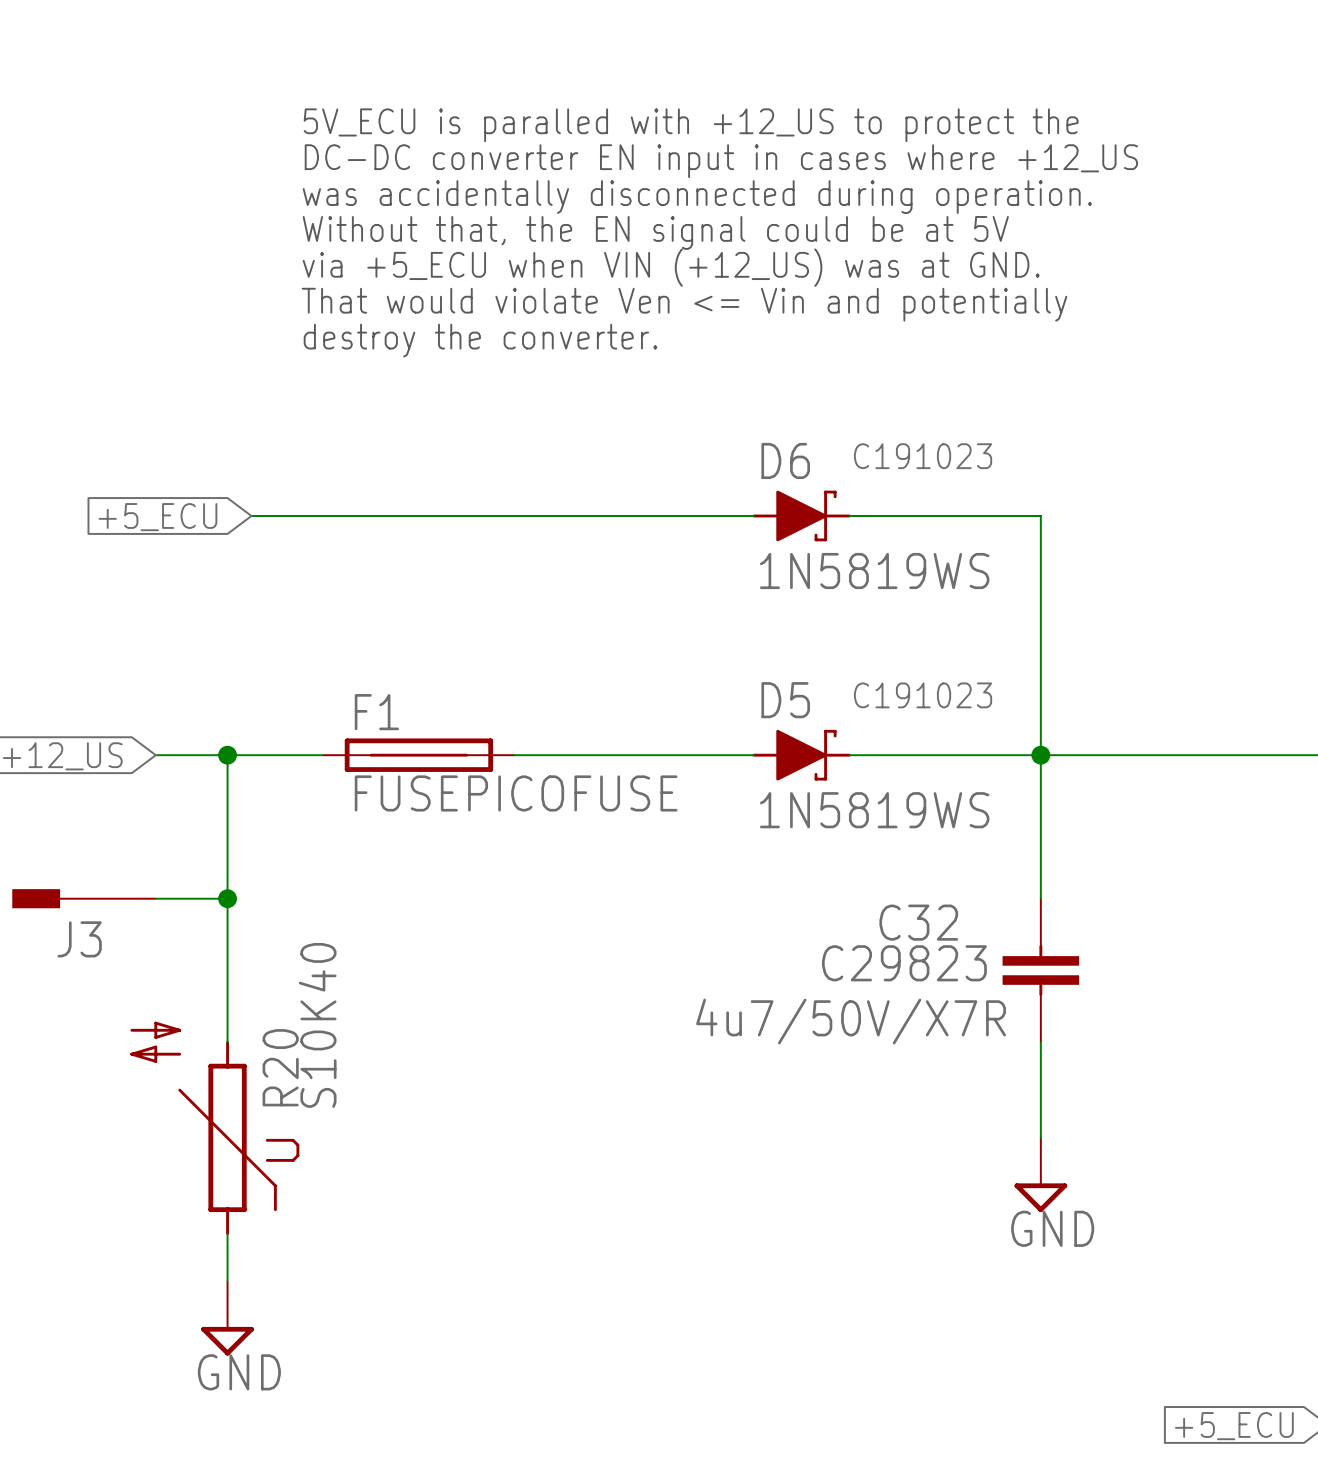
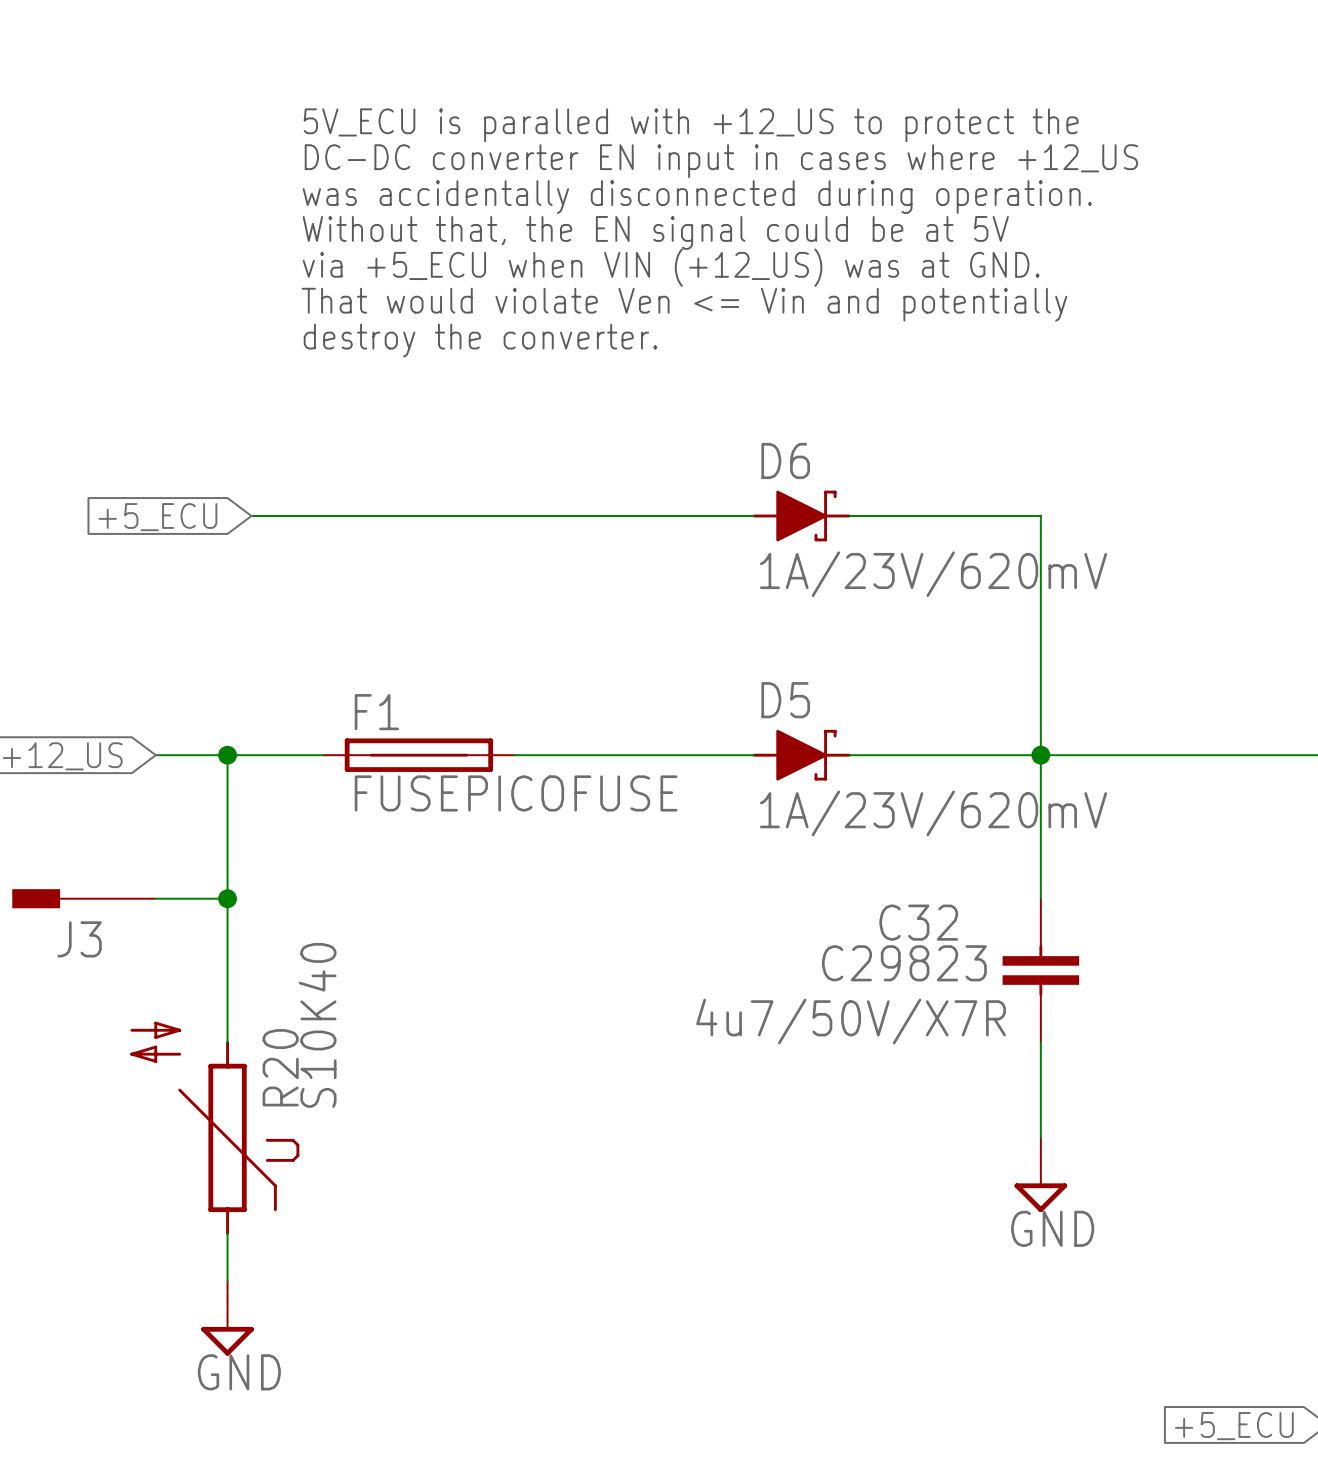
D6 text: C191023 (923, 456) -> none
D6 value: 1N5819WS (874, 571) -> 1A/23V/620mV (933, 574)
D5 text: C191023 (923, 695) -> none
D5 value: 1N5819WS (874, 810) -> 1A/23V/620mV (933, 813)

